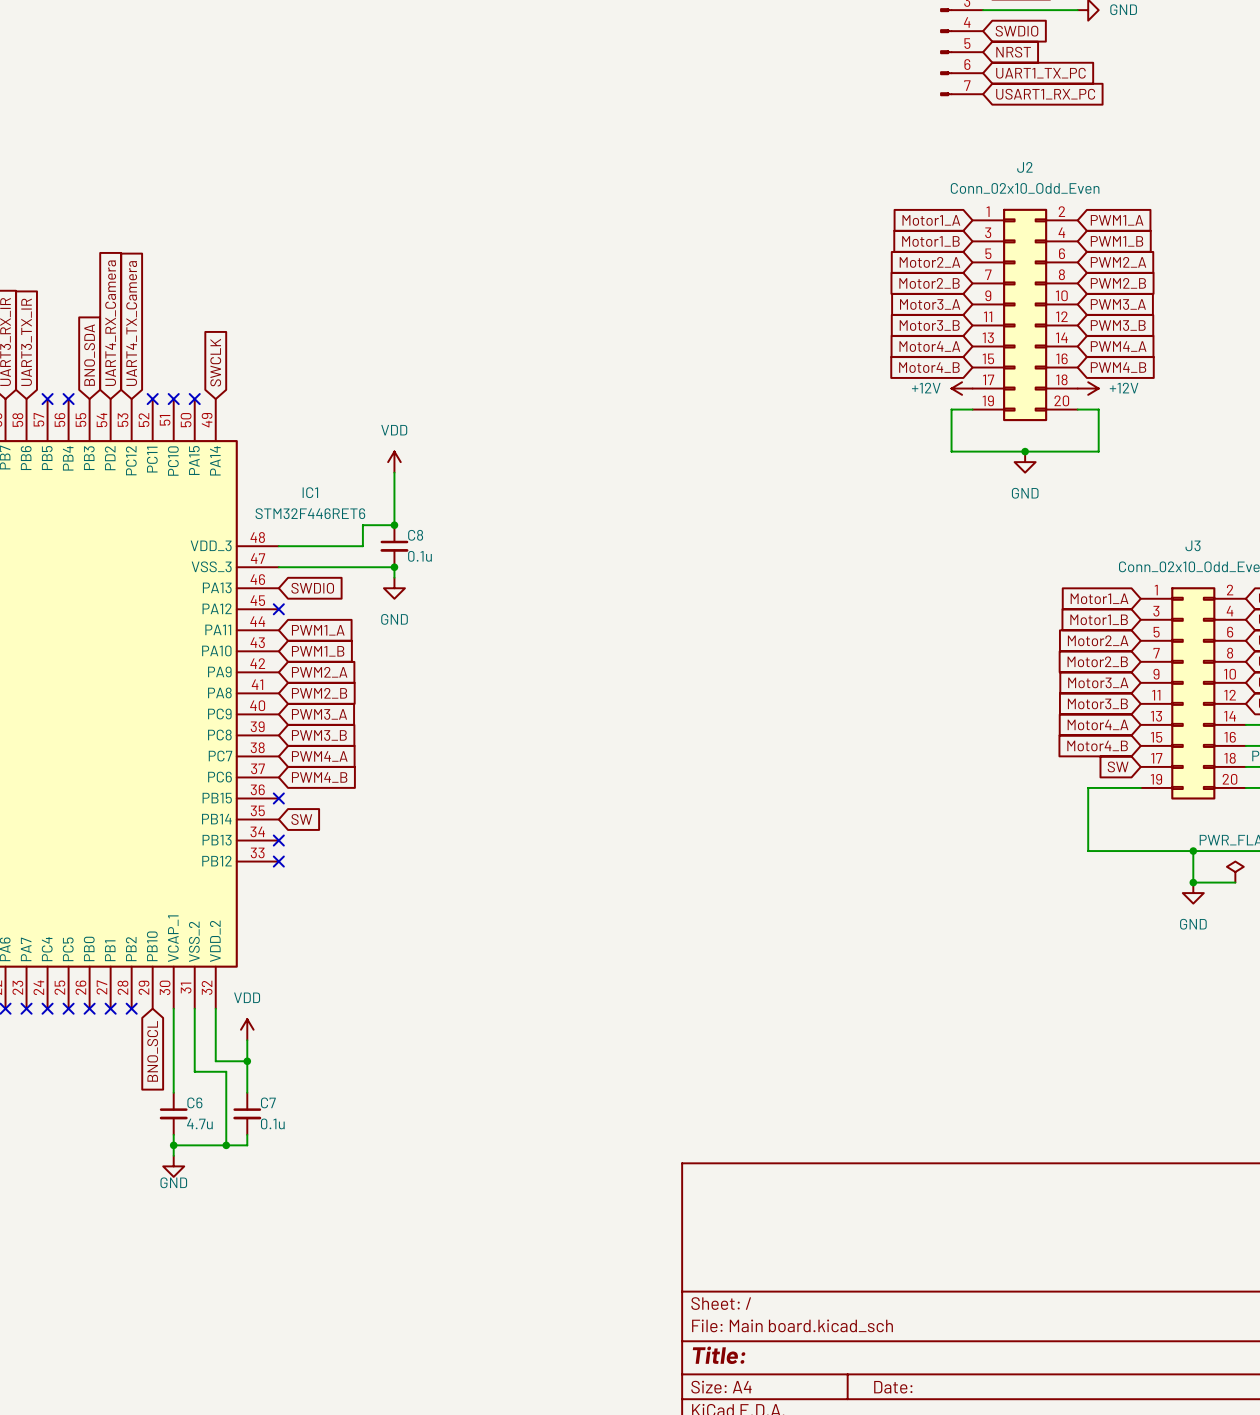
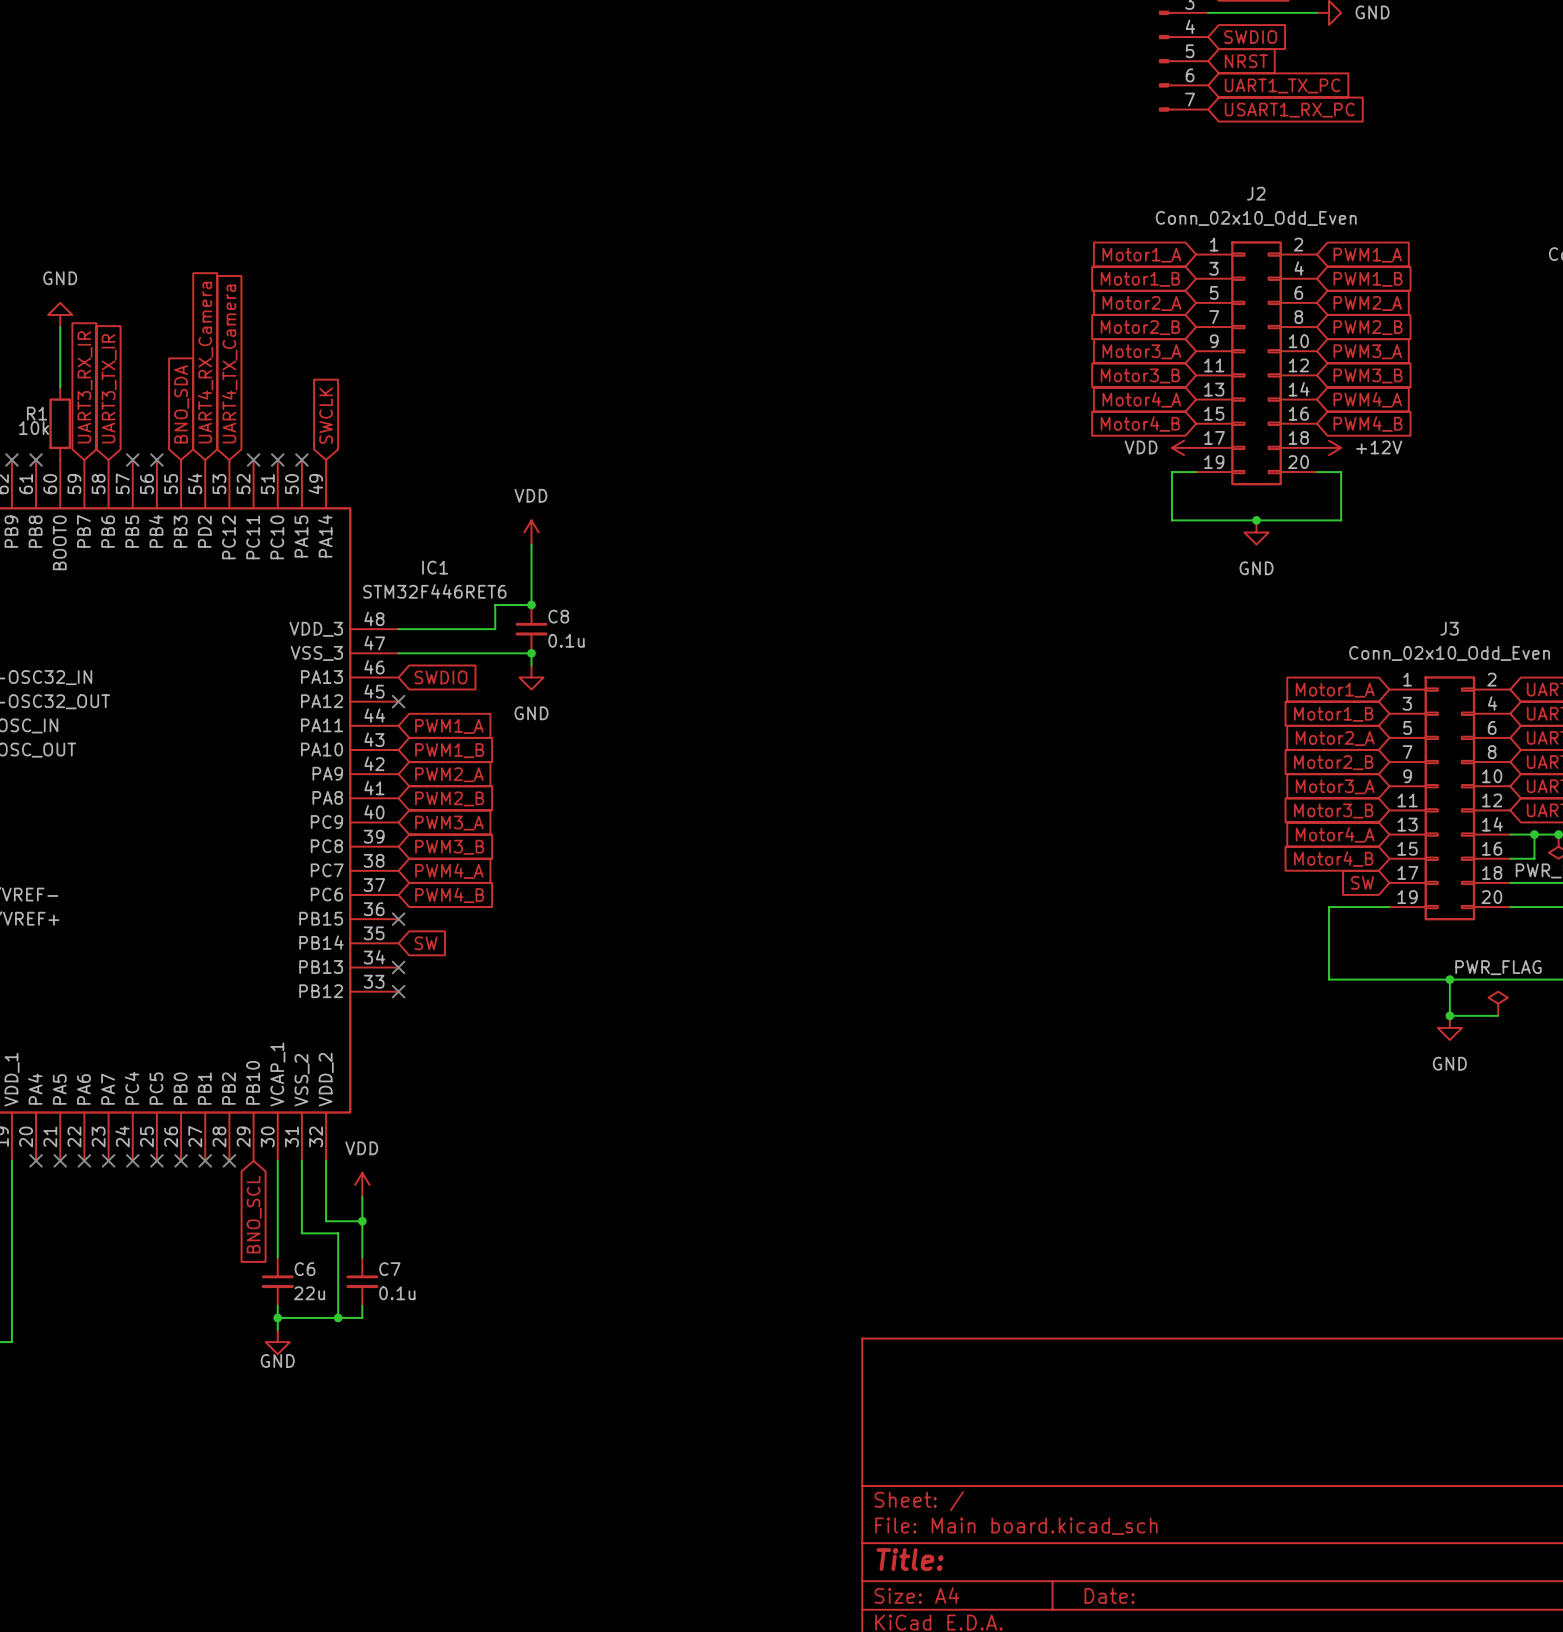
power symbol: +12V (962, 388) -> VDD (1184, 447)
C6 value: 4.7u (199, 1123) -> 22u (309, 1293)

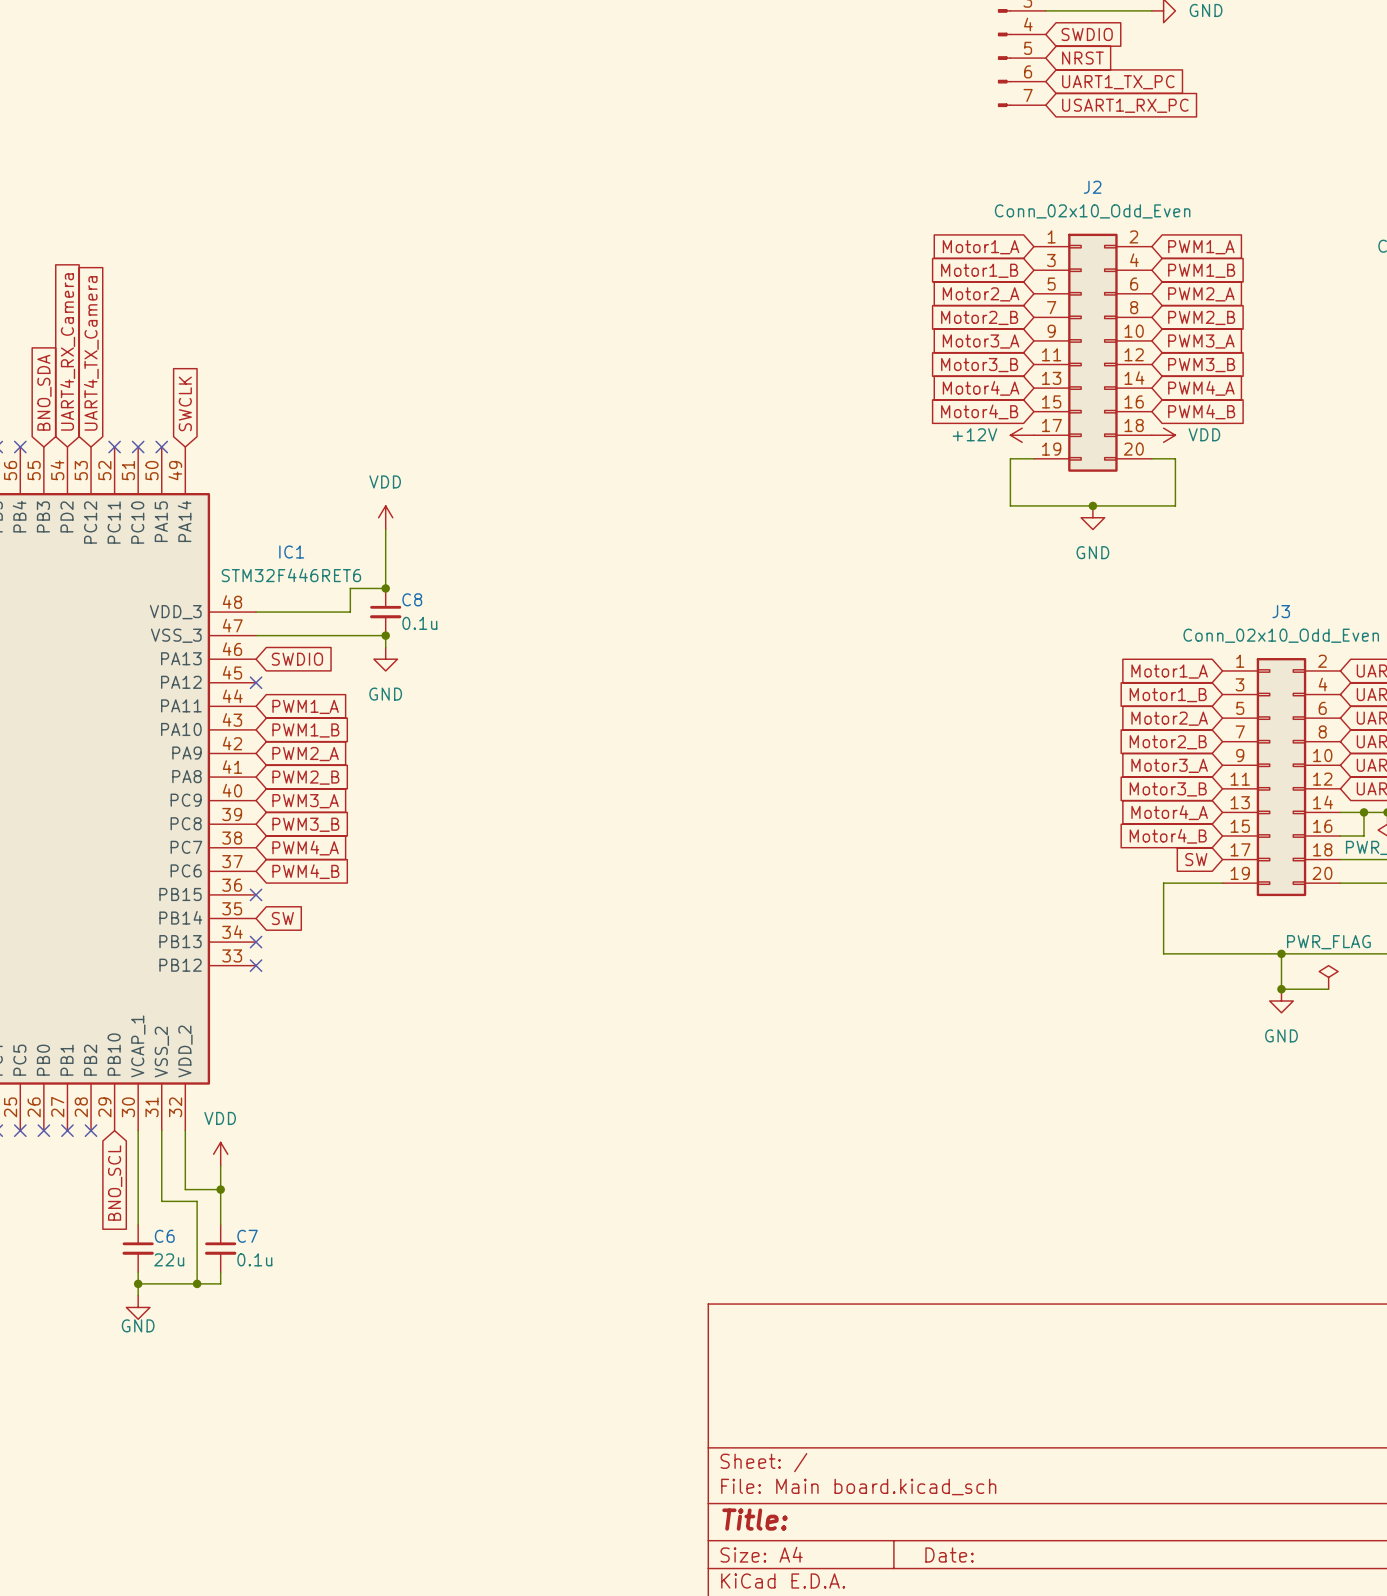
power symbol: VDD (1184, 447) -> +12V (1022, 435)
power symbol: +12V (1329, 447) -> VDD (1163, 435)

